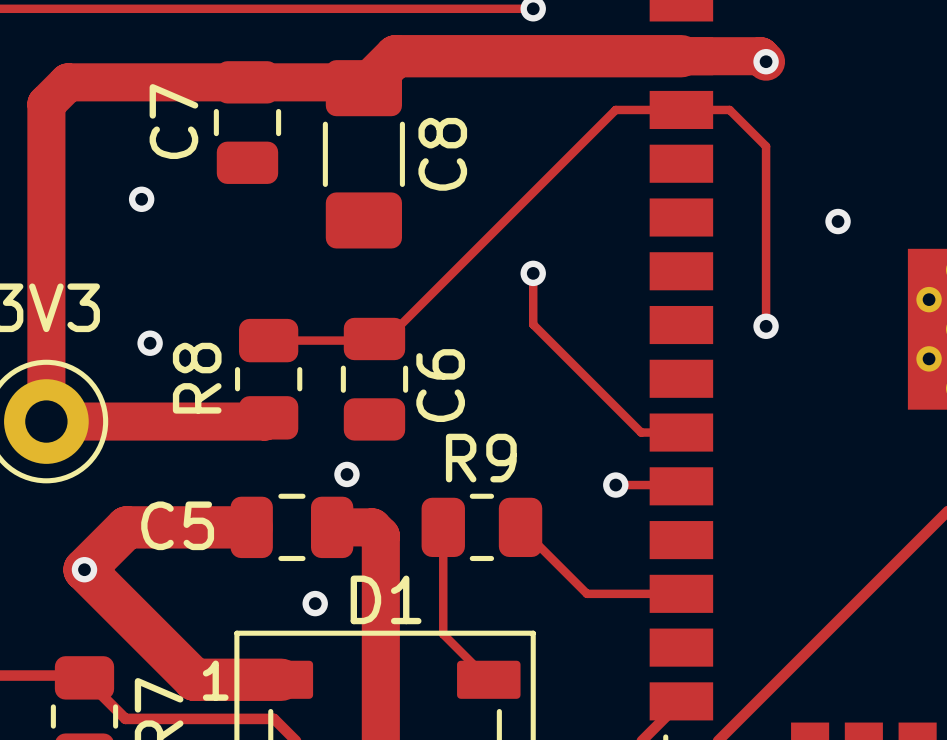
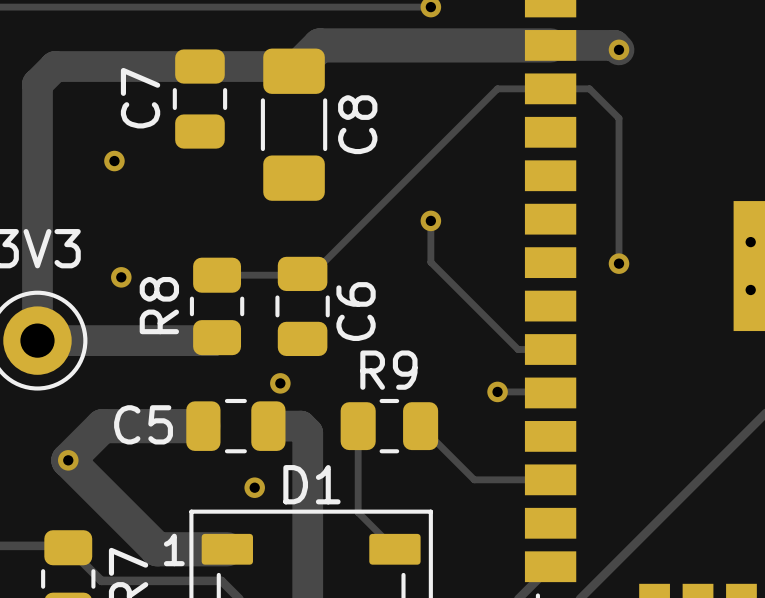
via: (838, 221) -> none

